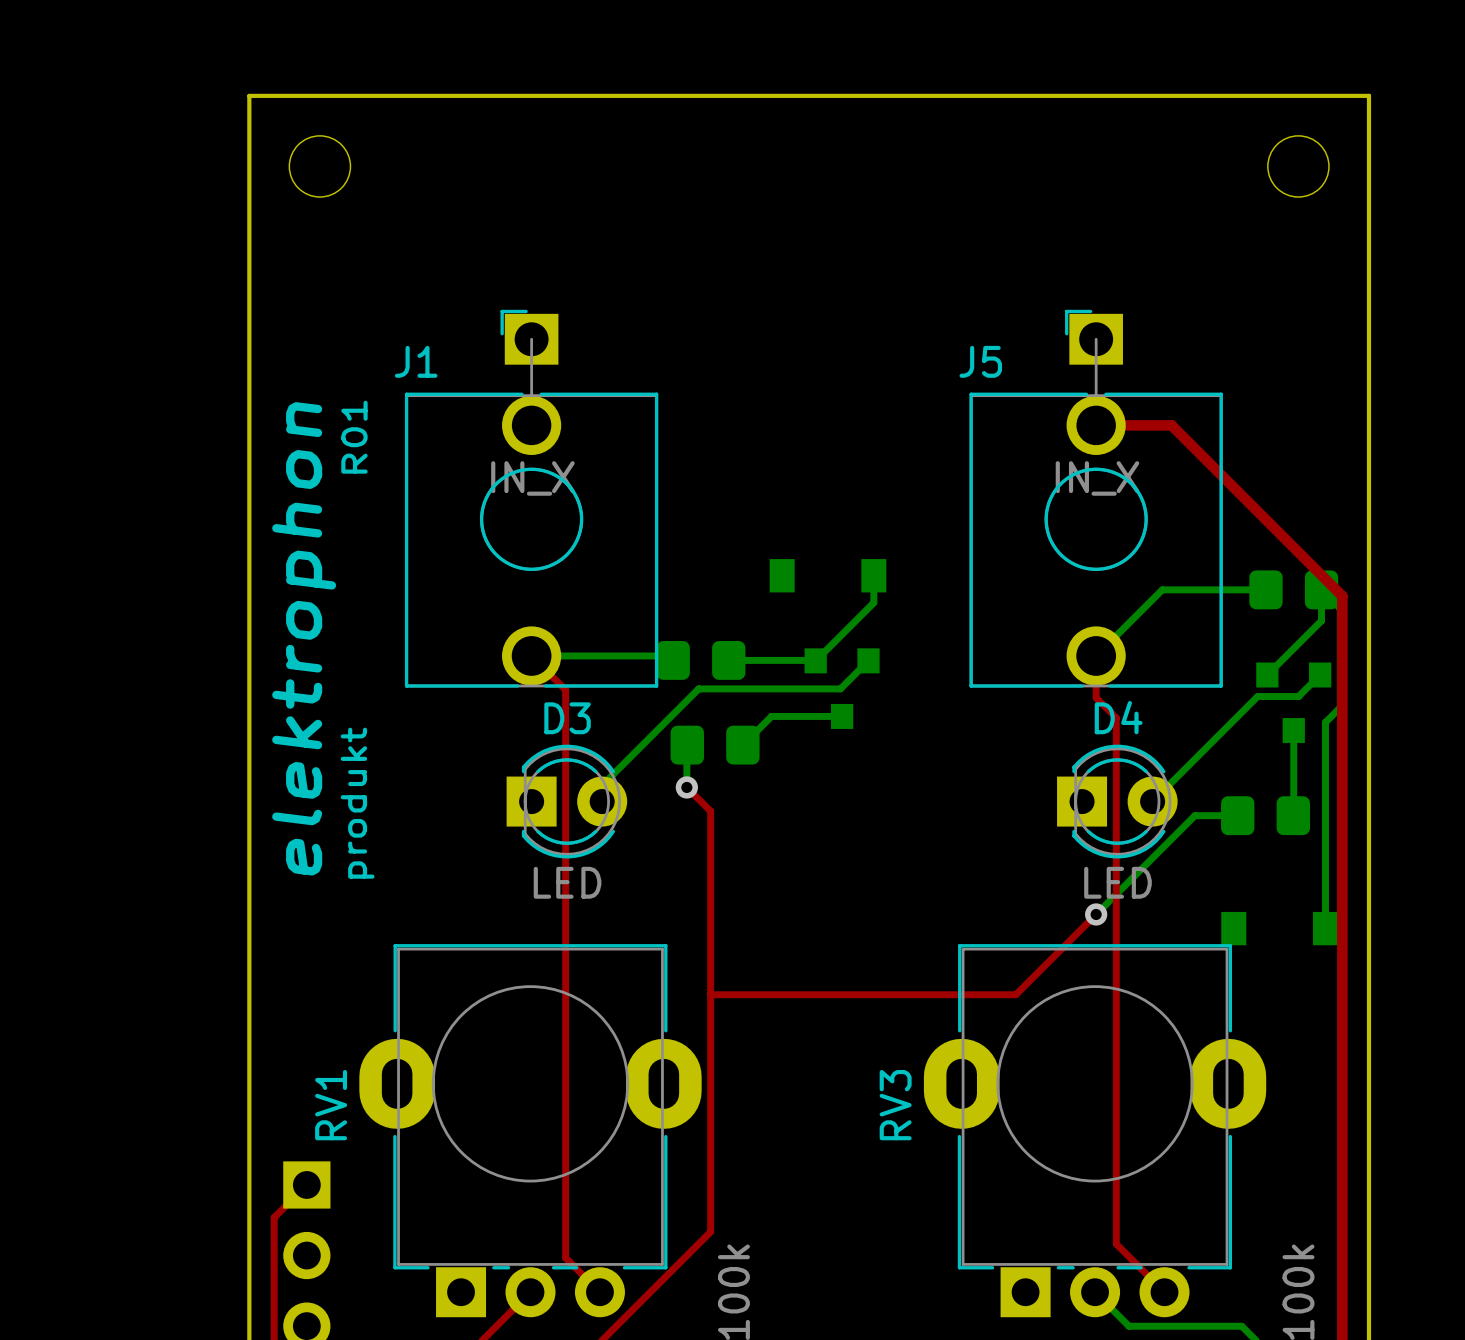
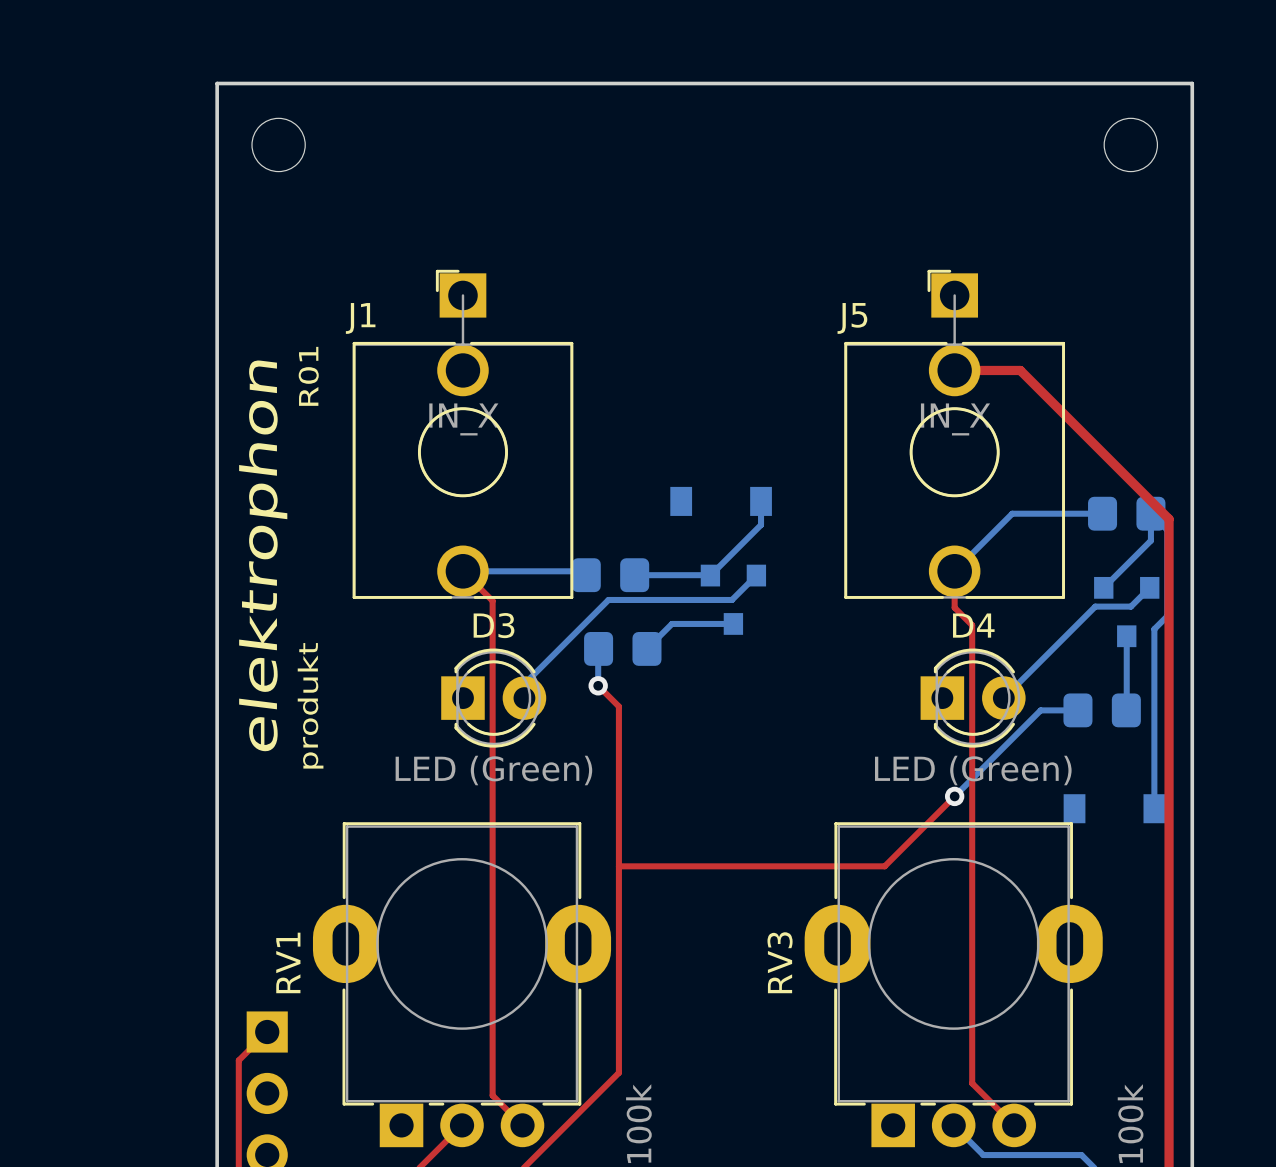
D3 value: LED (567, 882) -> LED (Green) (493, 770)
D4 value: LED (1117, 882) -> LED (Green) (973, 770)

